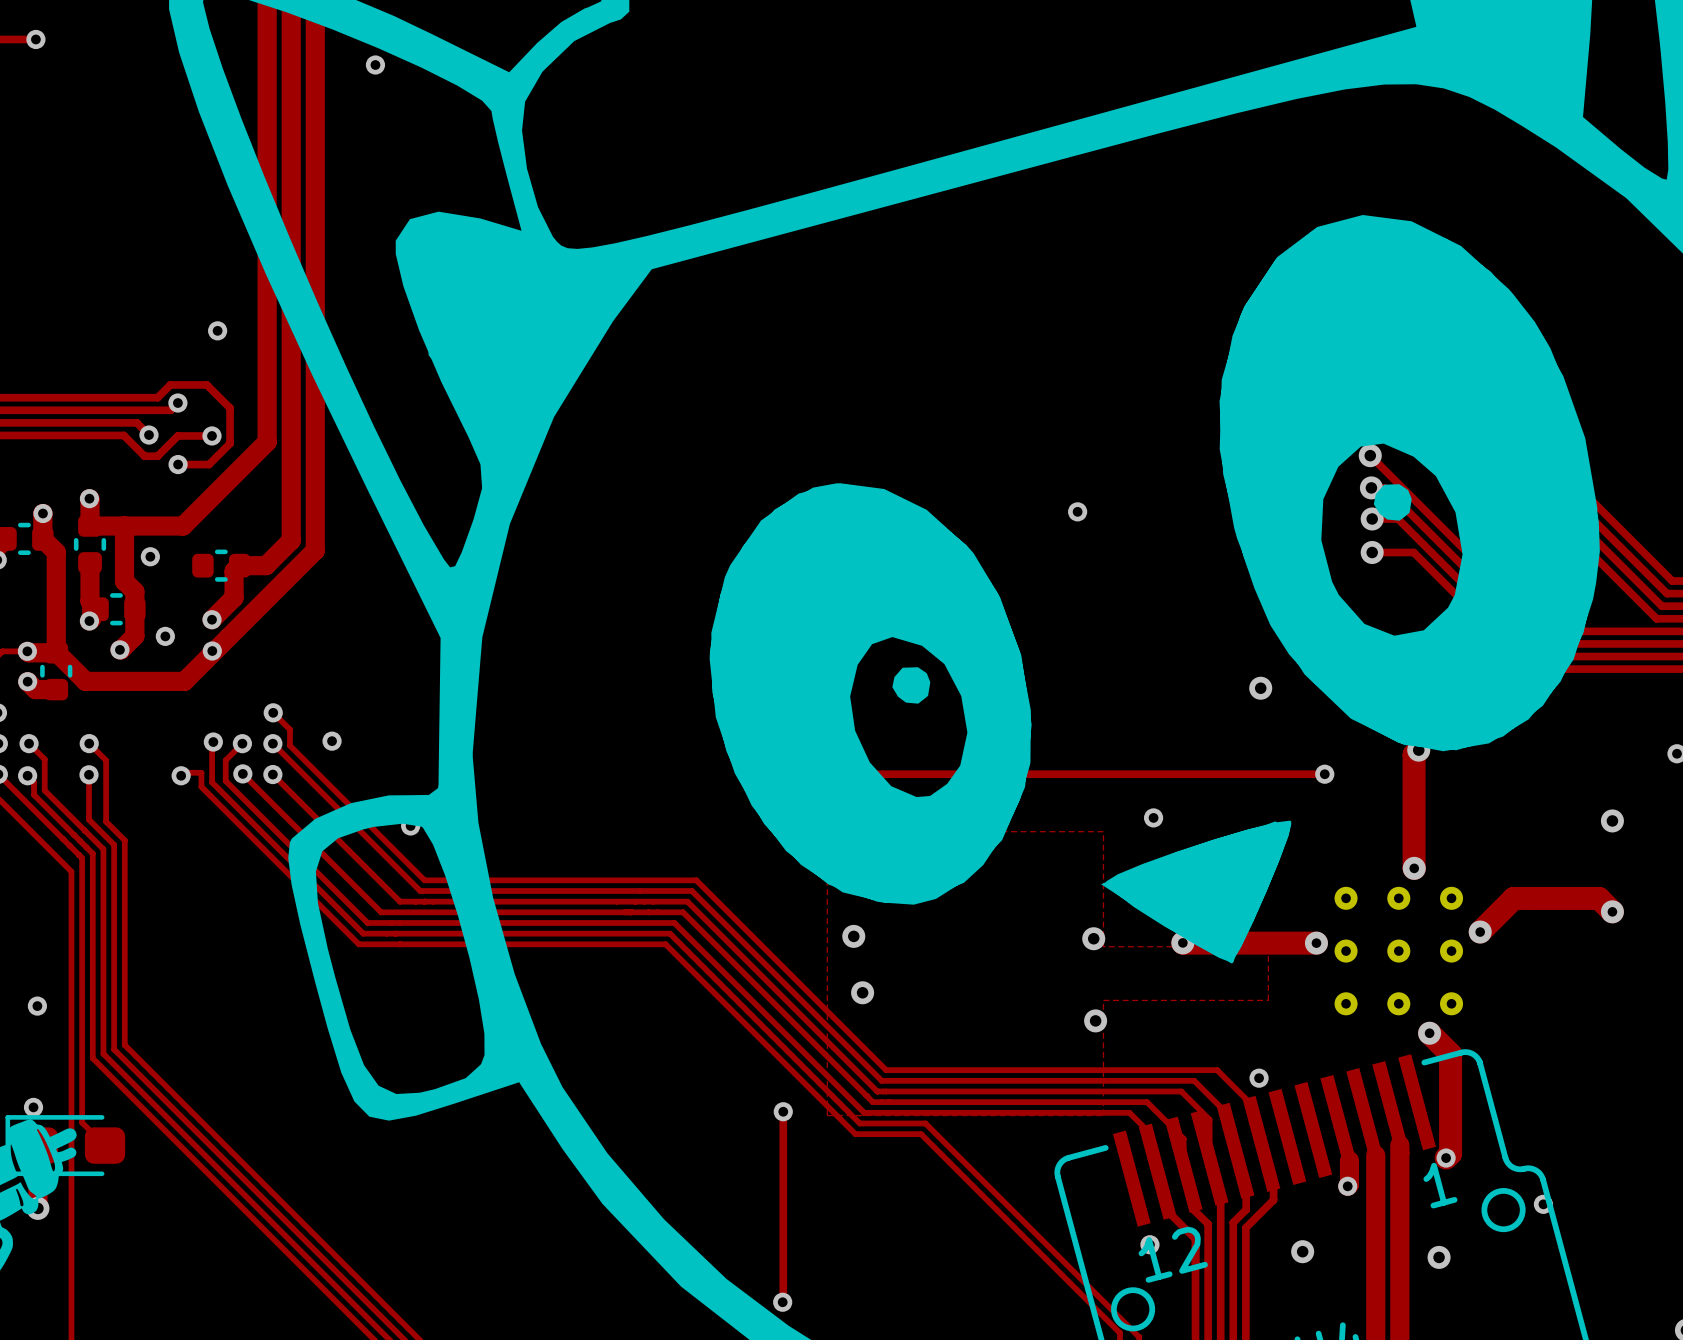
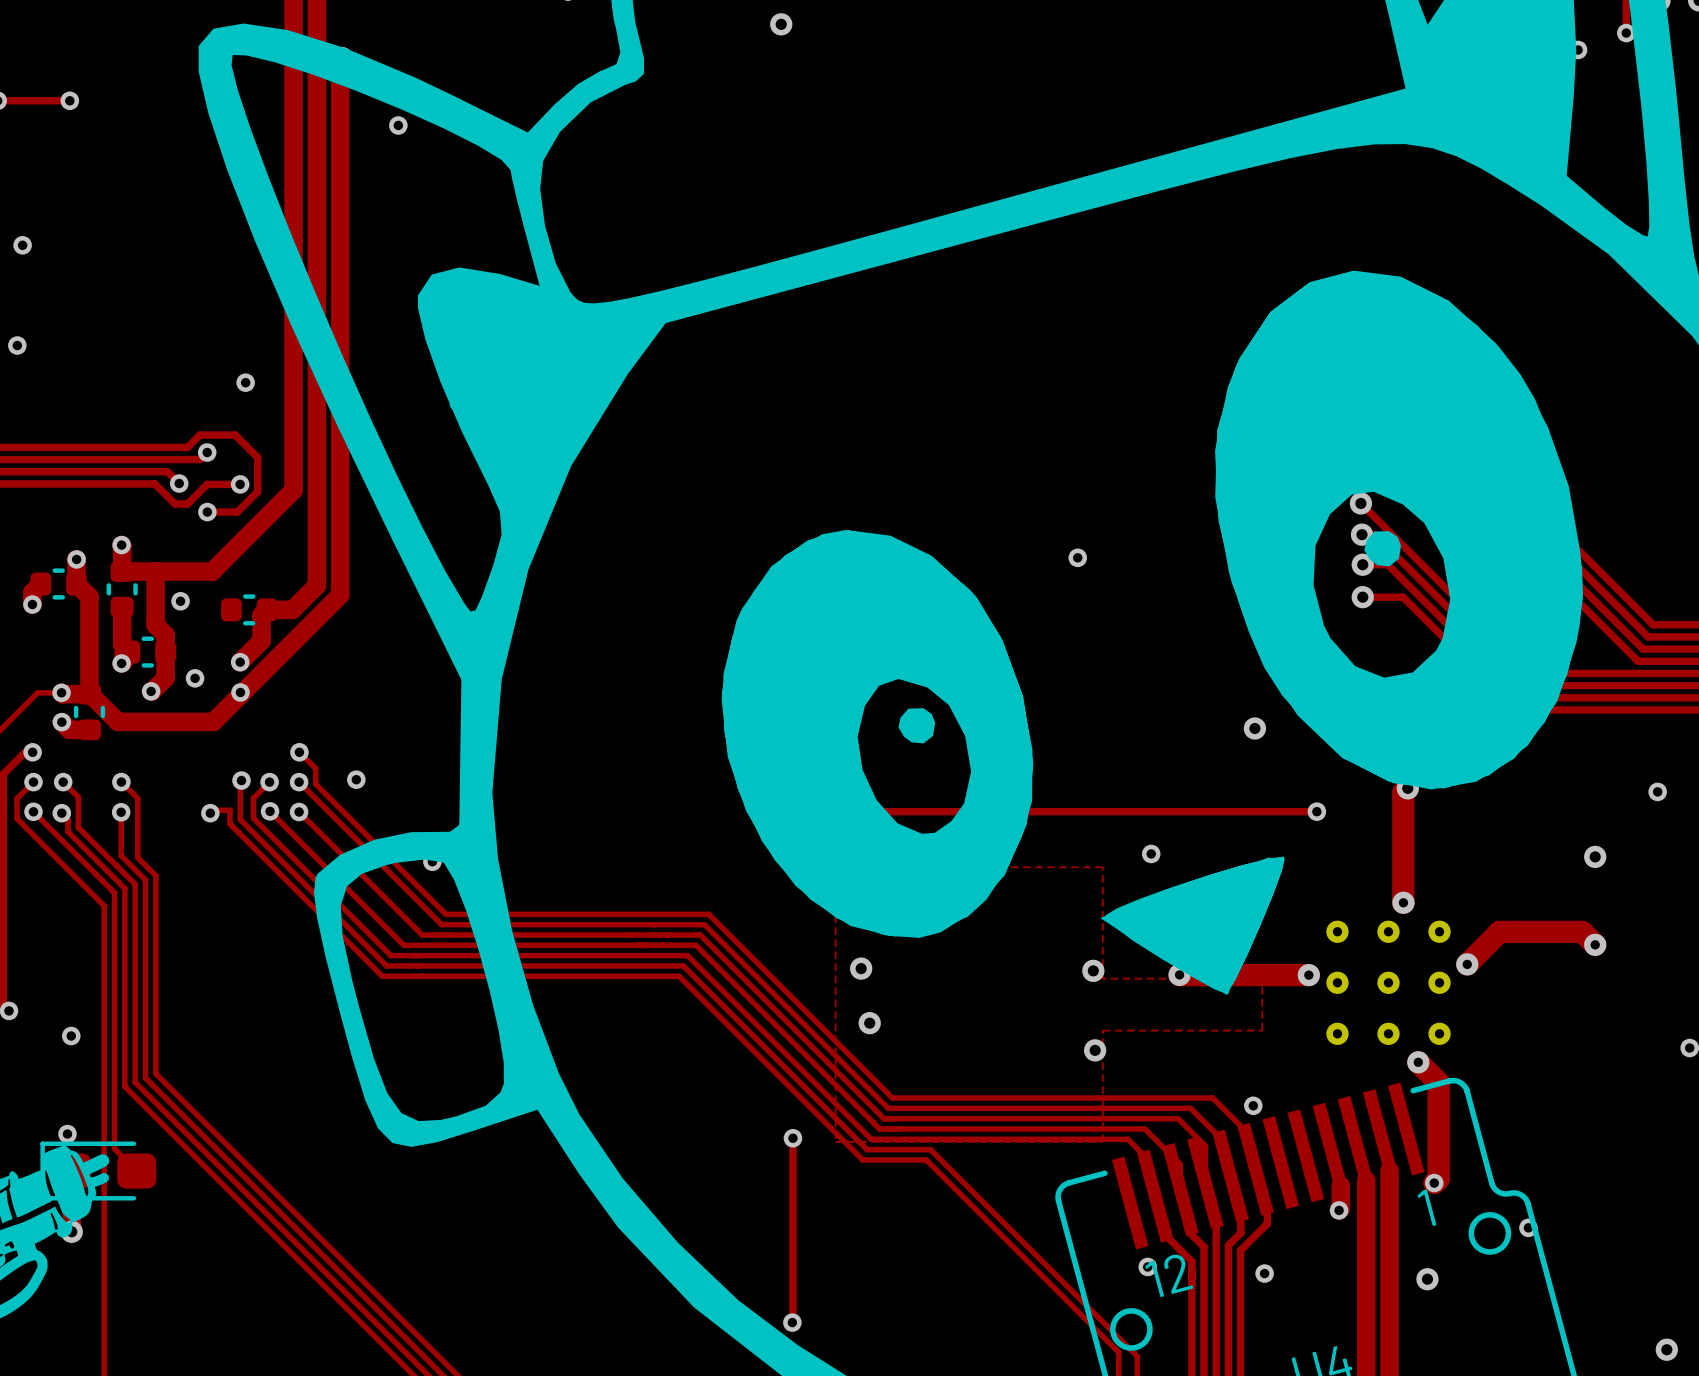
via: none -> (1264, 1273)
via: (1302, 1251) -> none

